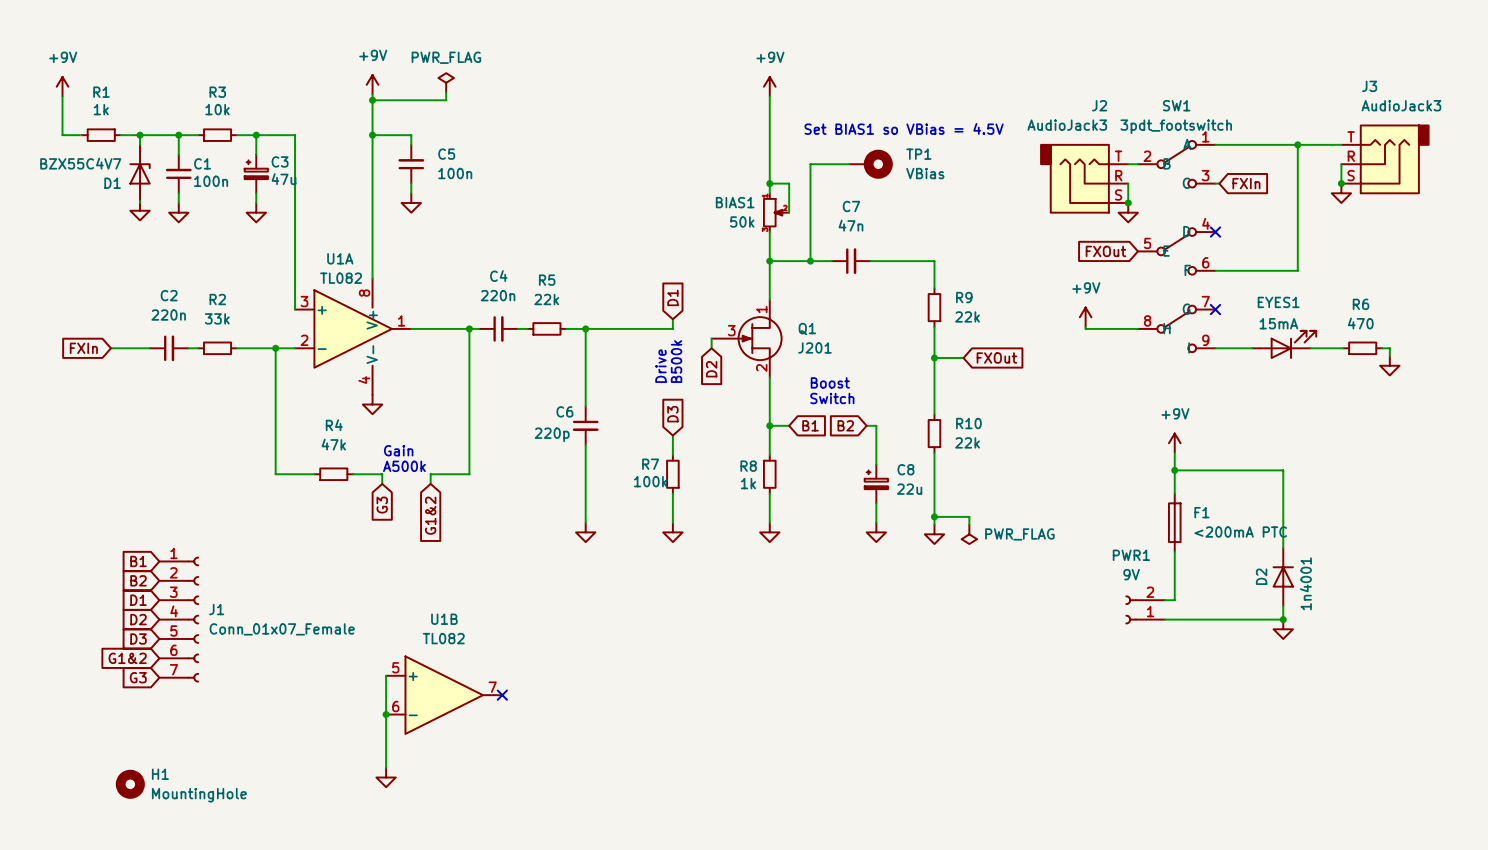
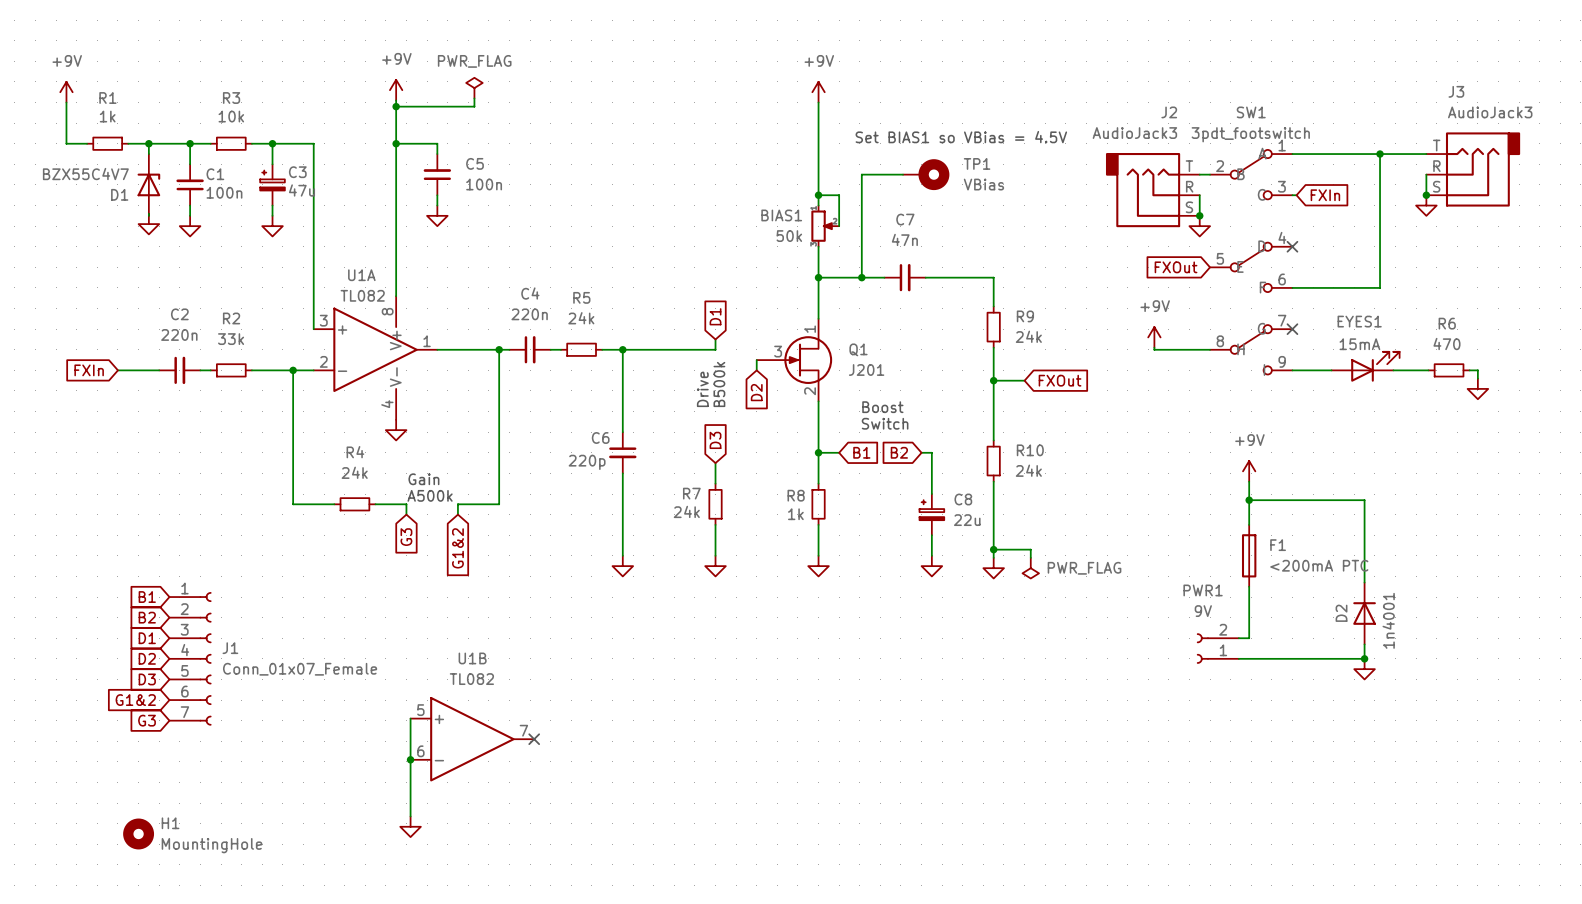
R5 value: 22k (546, 299) -> 24k (581, 318)
R9 value: 22k (967, 316) -> 24k (1028, 336)
R10 value: 22k (967, 442) -> 24k (1028, 470)
R4 value: 47k (333, 444) -> 24k (354, 472)
R7 value: 100k (650, 481) -> 24k (686, 511)

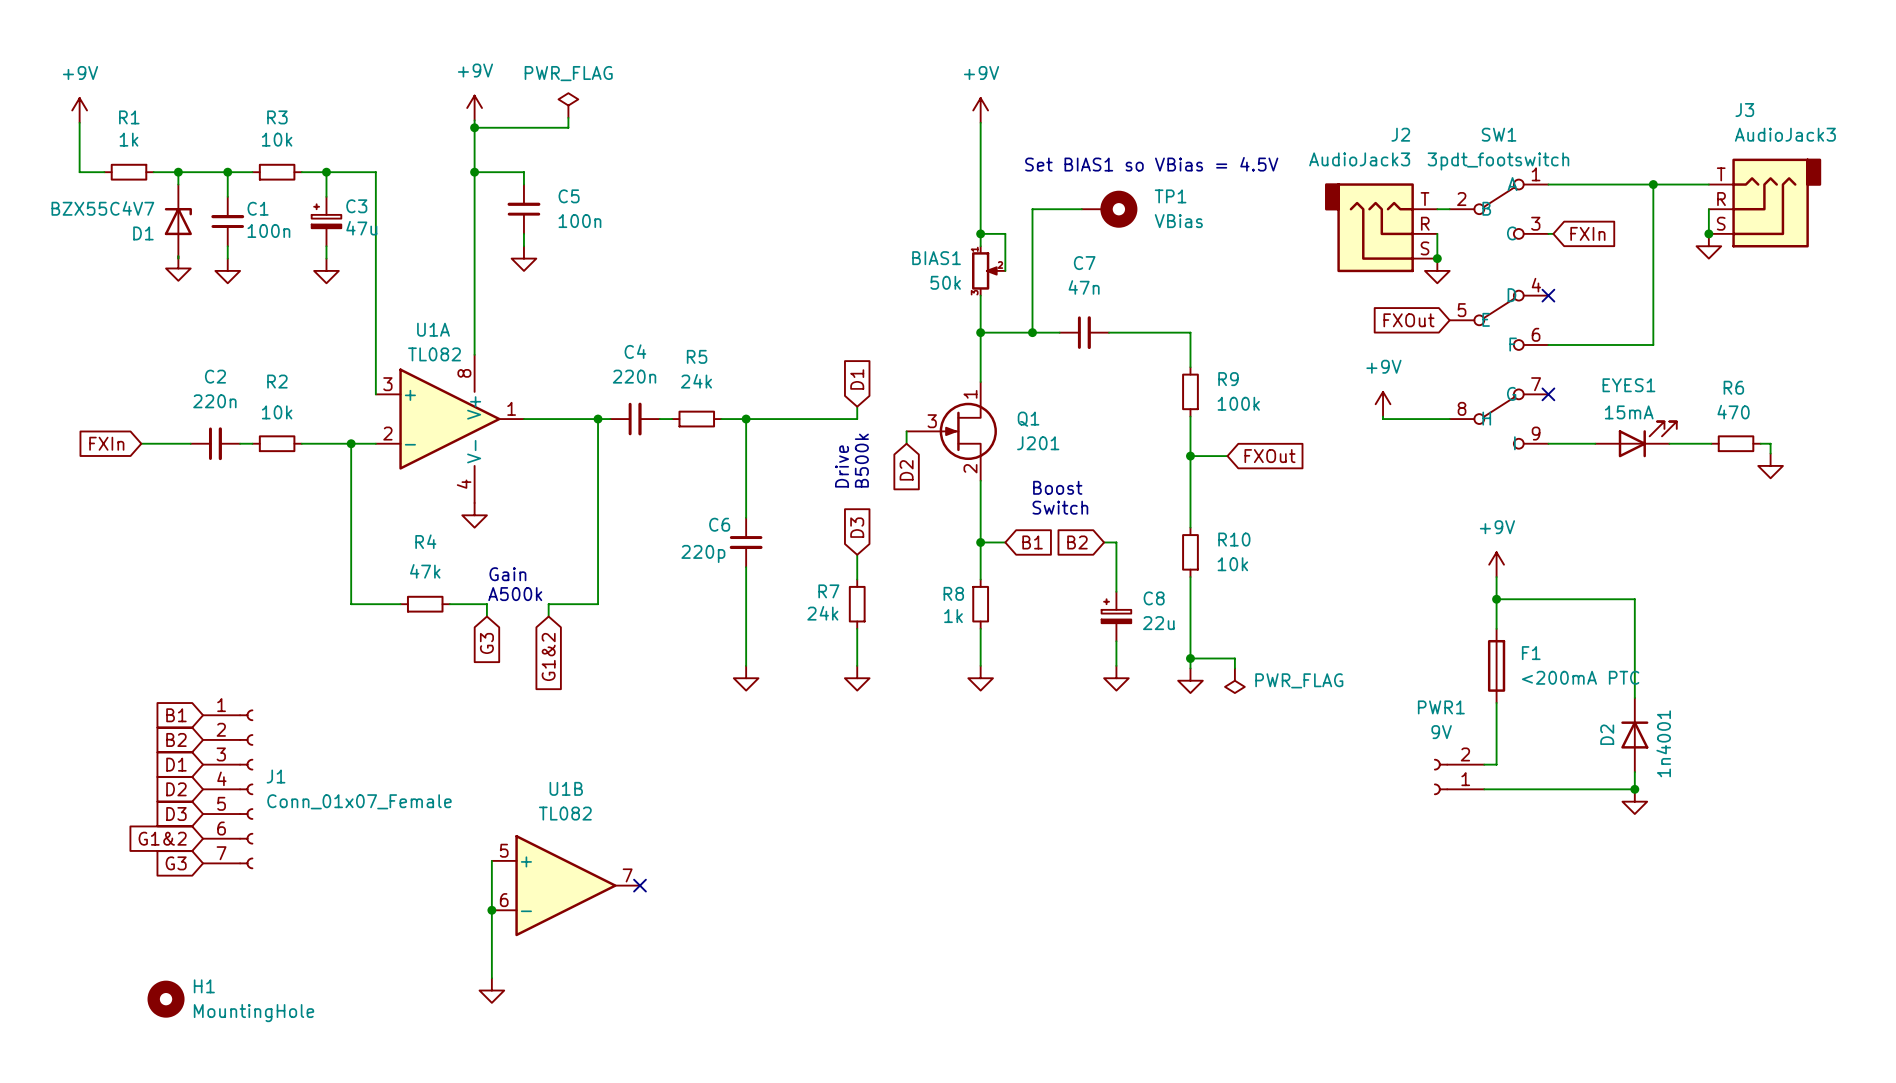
R9 value: 24k (1028, 336) -> 100k (1238, 403)
R2 value: 33k (231, 339) -> 10k (277, 412)
R10 value: 24k (1028, 470) -> 10k (1232, 564)
R4 value: 24k (354, 472) -> 47k (425, 571)

